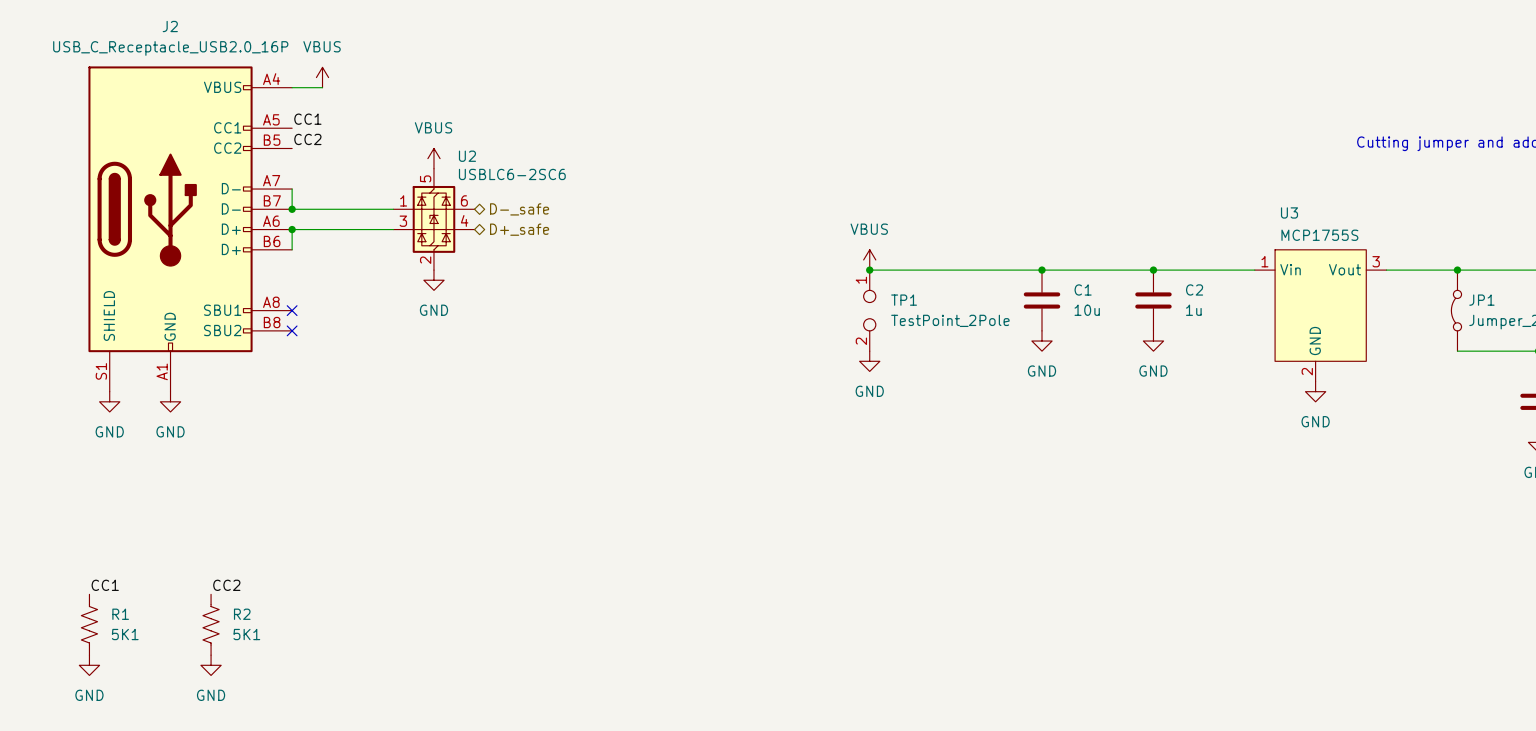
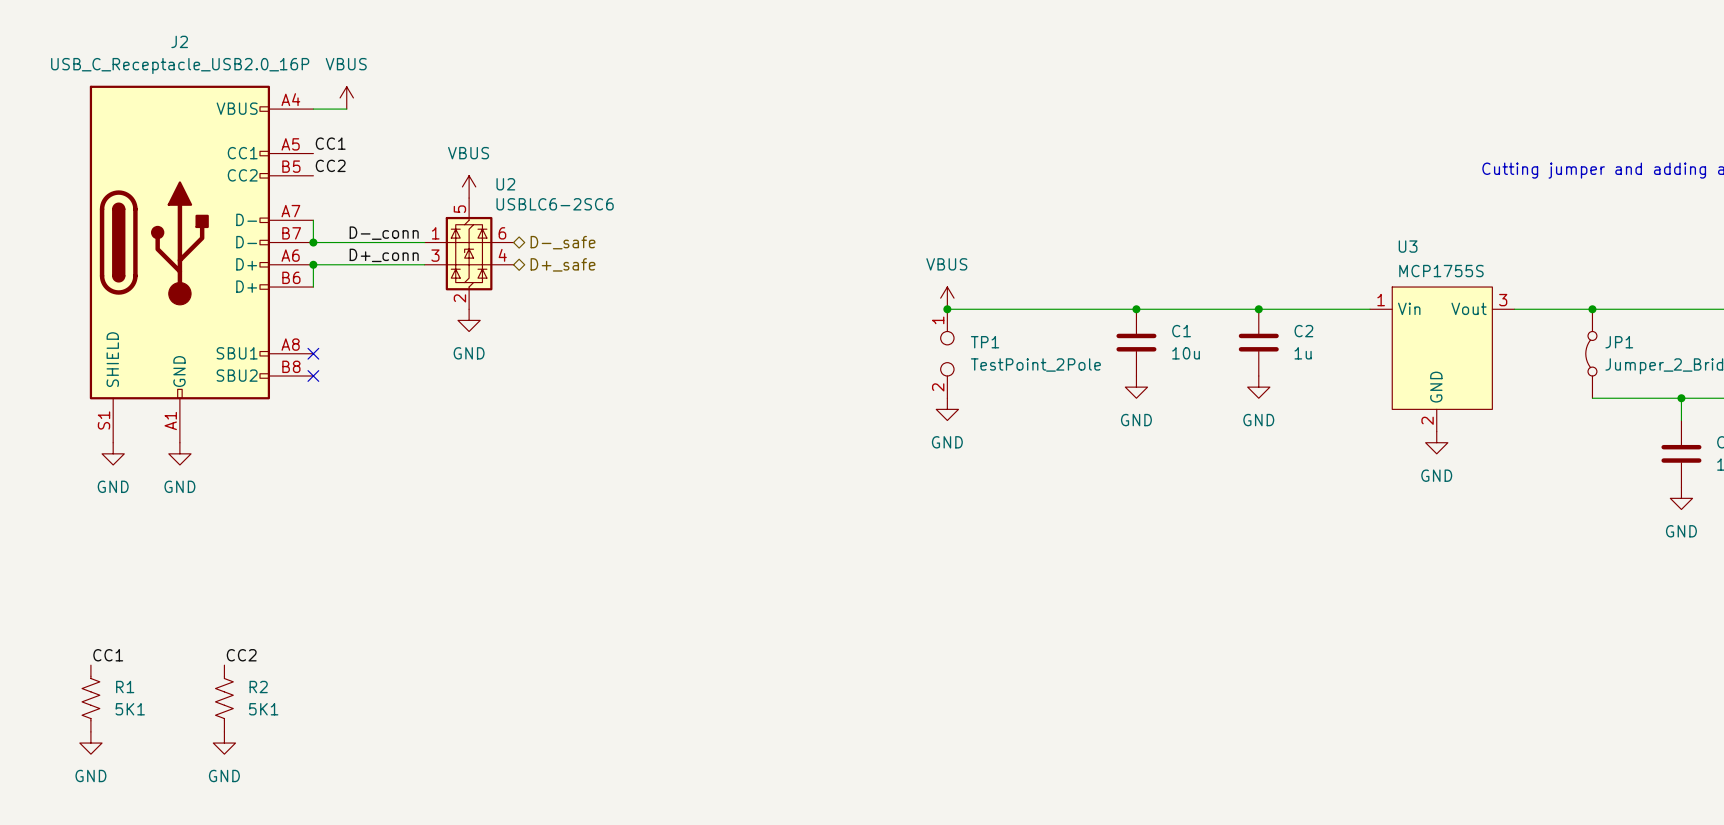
label: none -> D-_conn (384, 233)
label: none -> D+_conn (384, 255)

